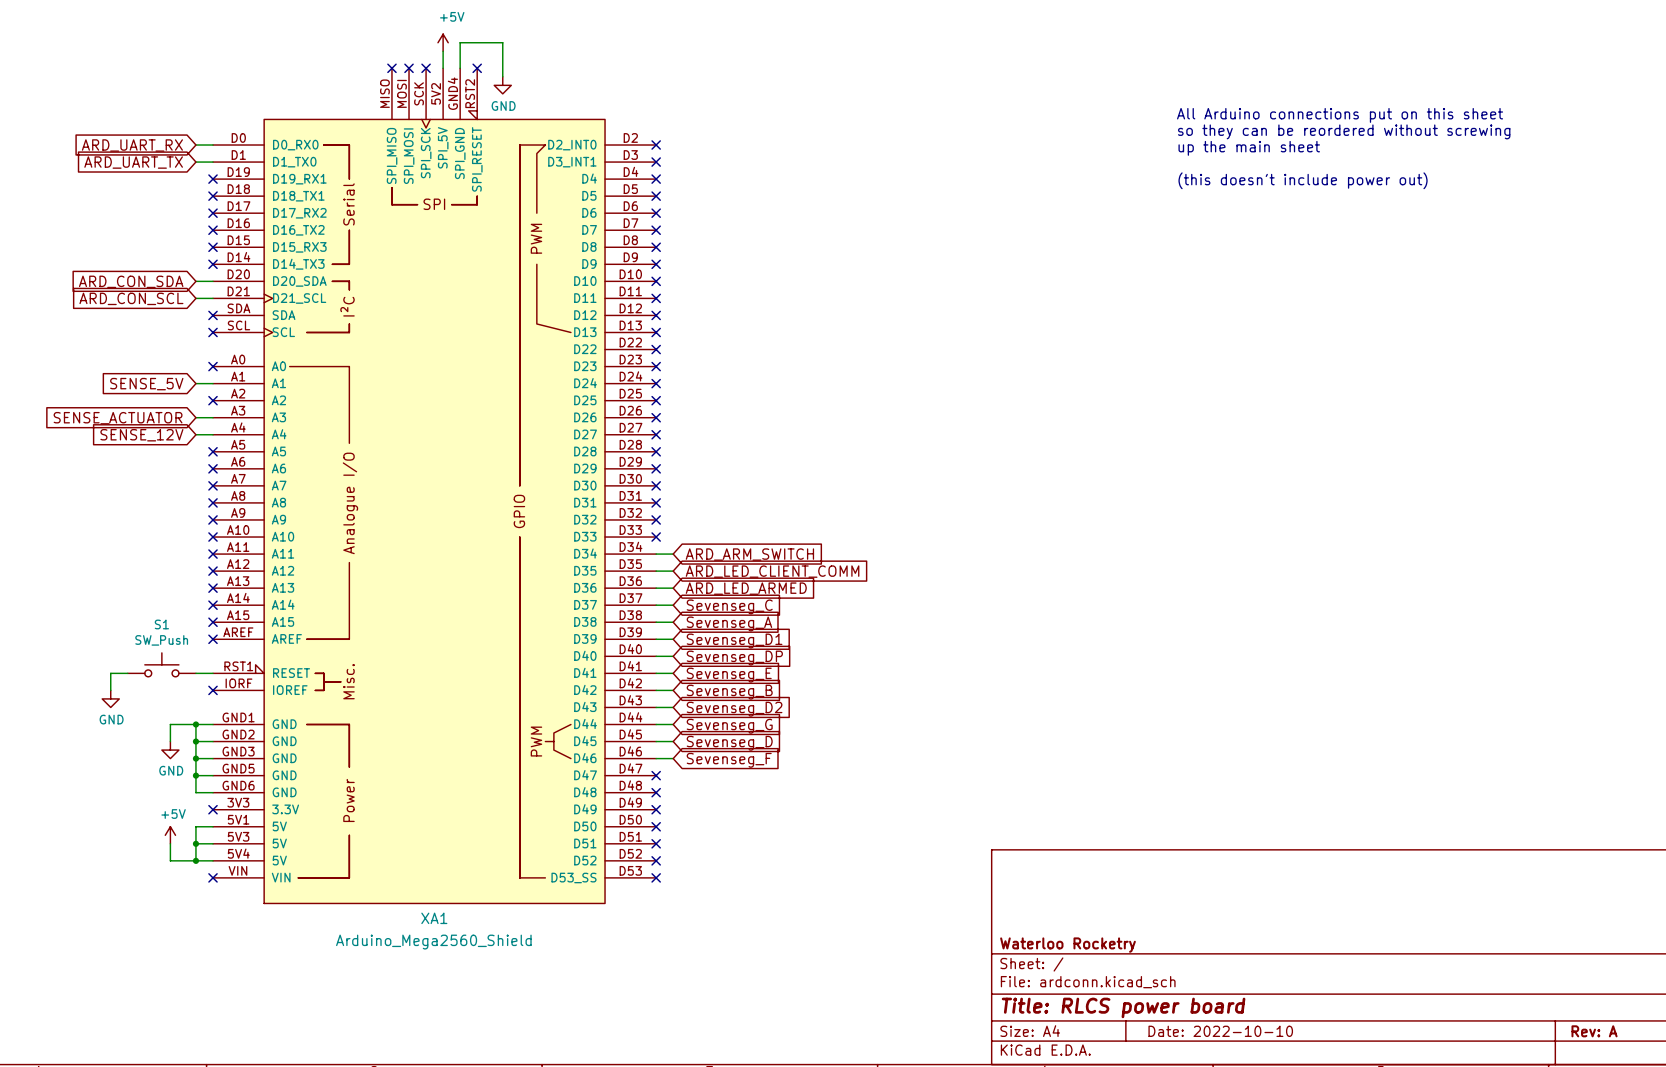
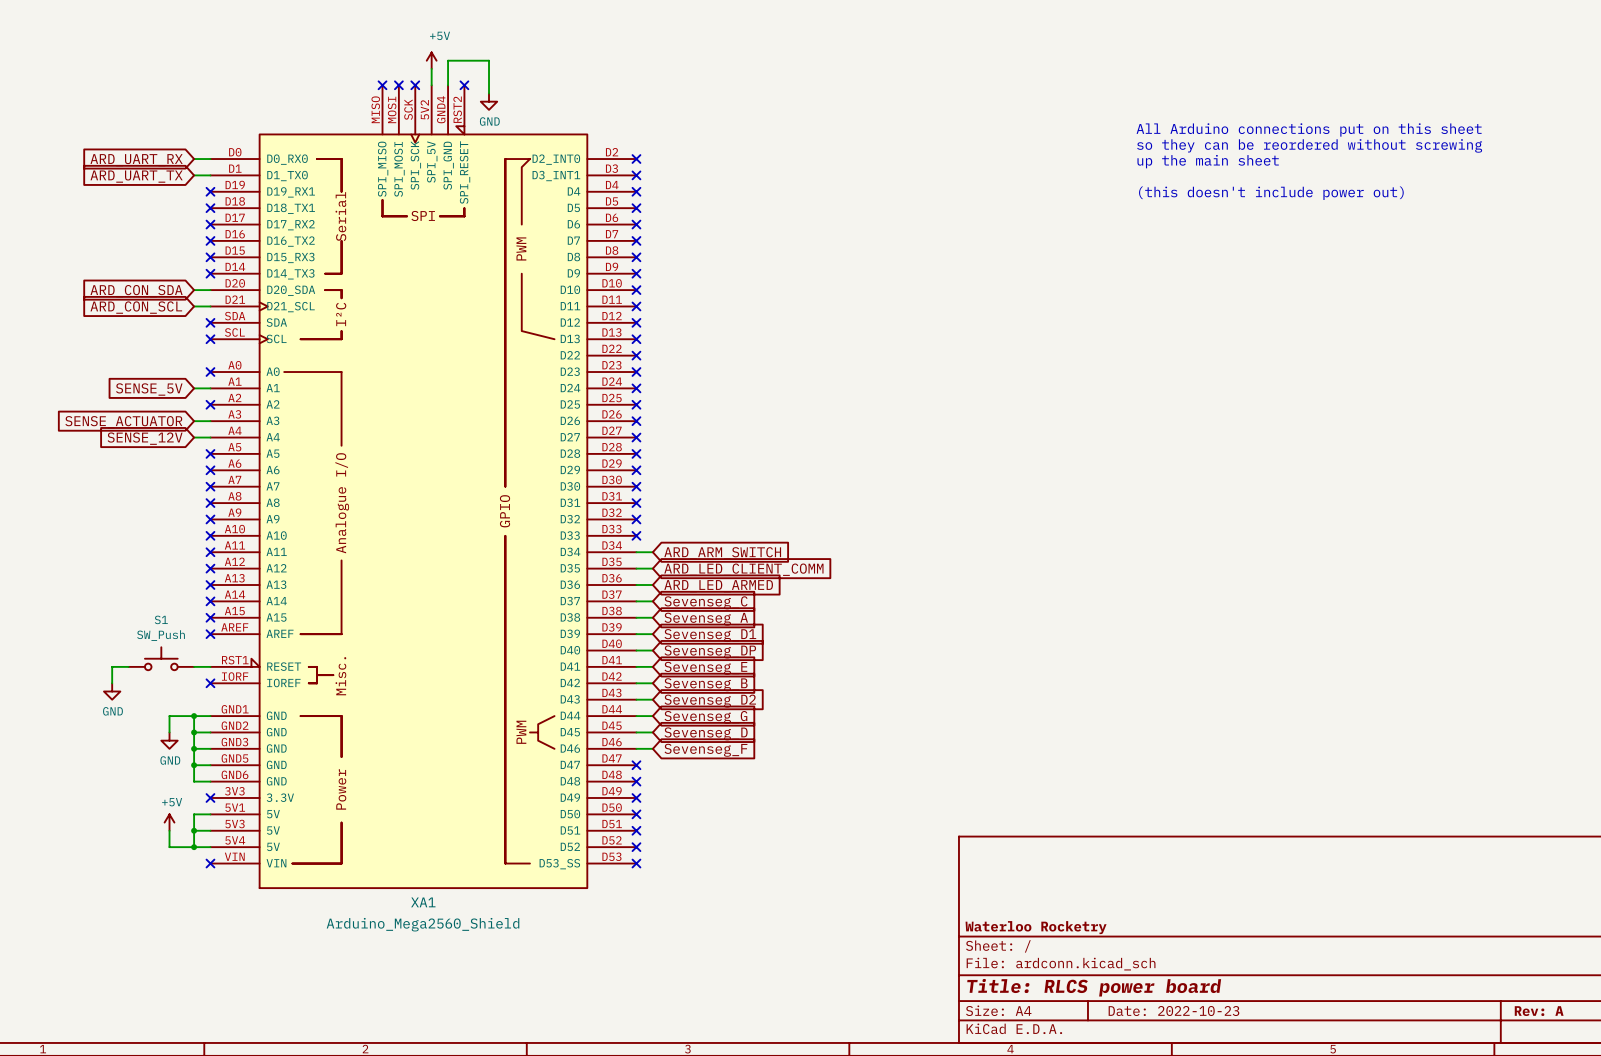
title block: Date: 2022-10-10 (1220, 1031) -> Date: 2022-10-23 (1173, 1011)

